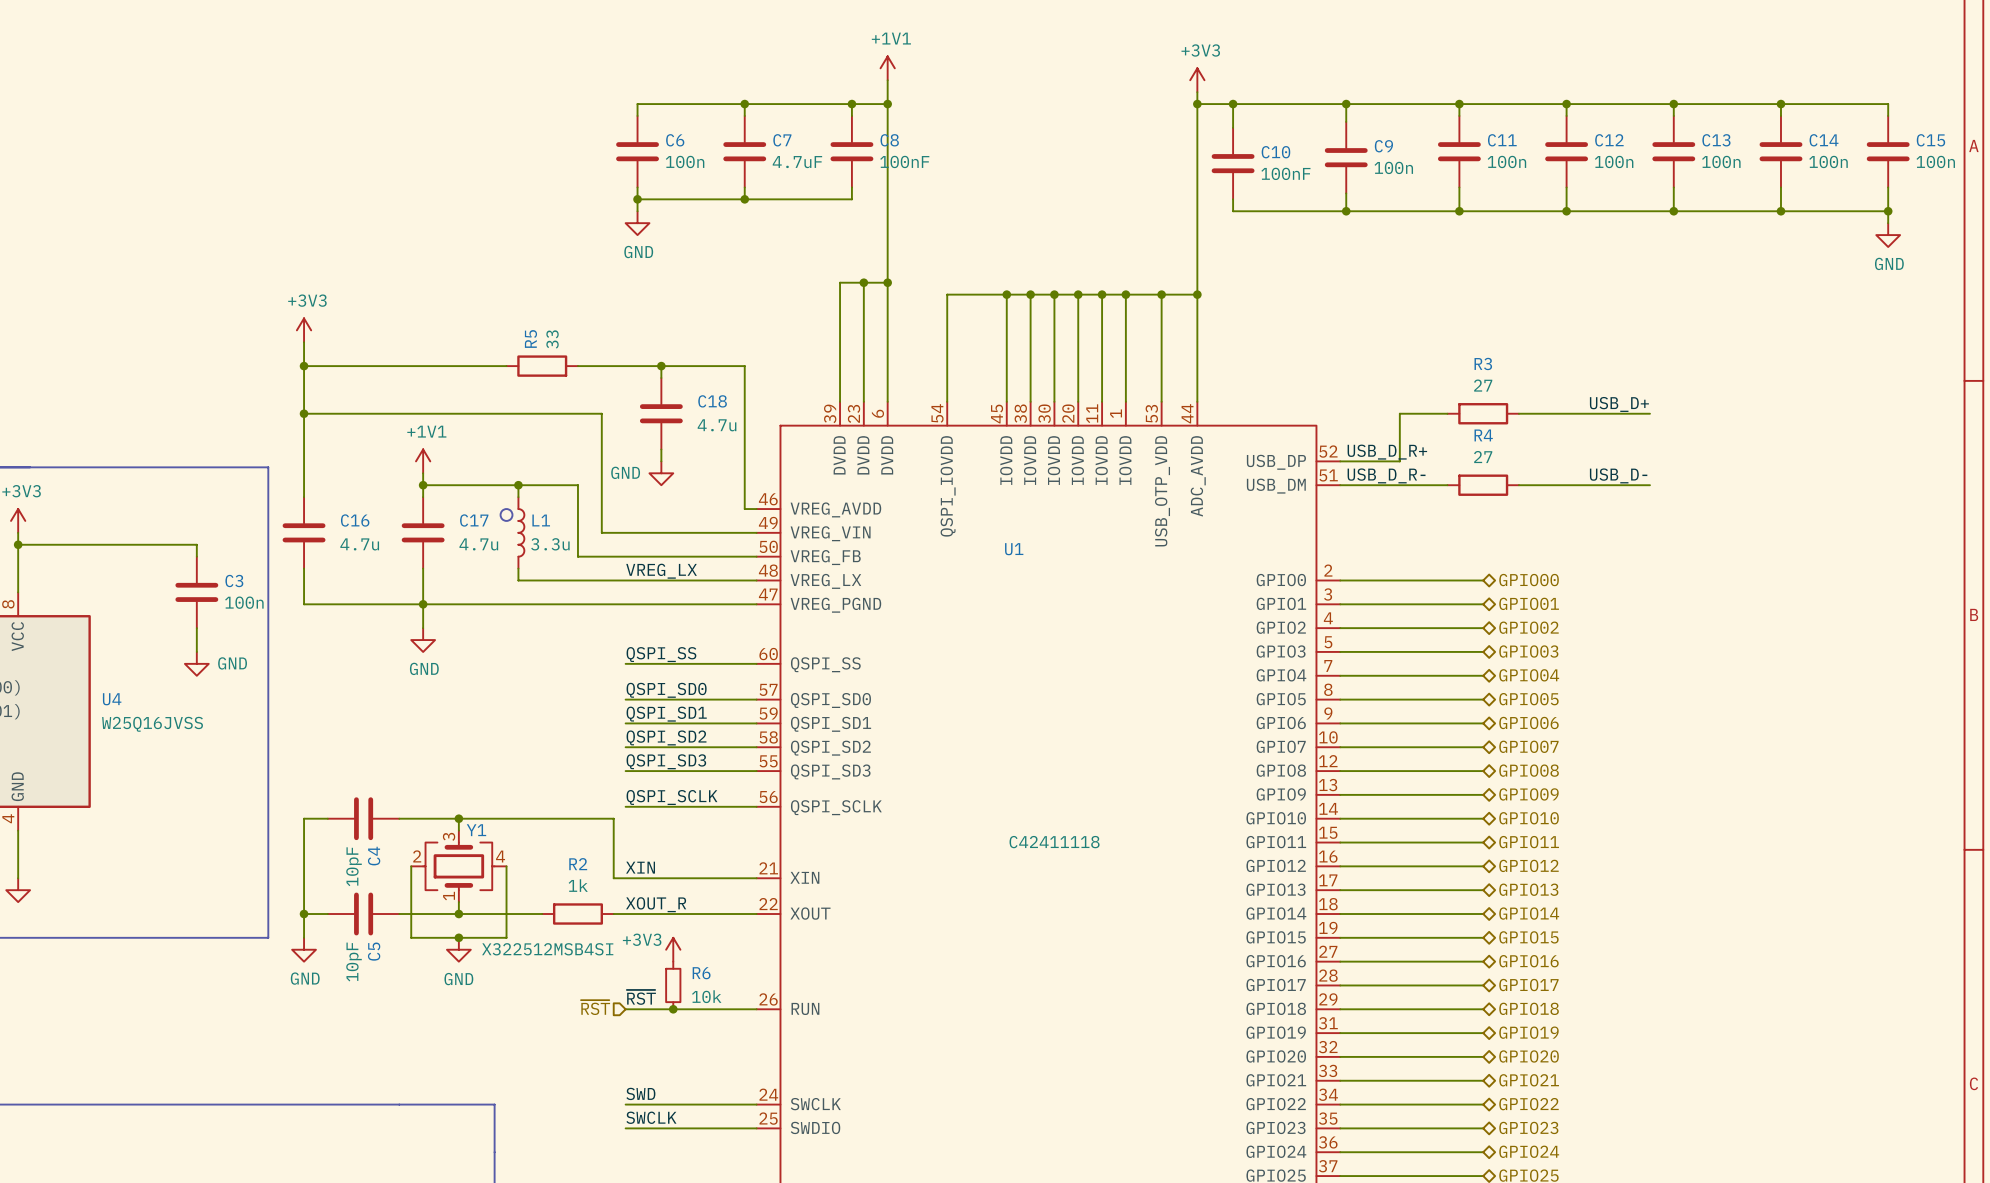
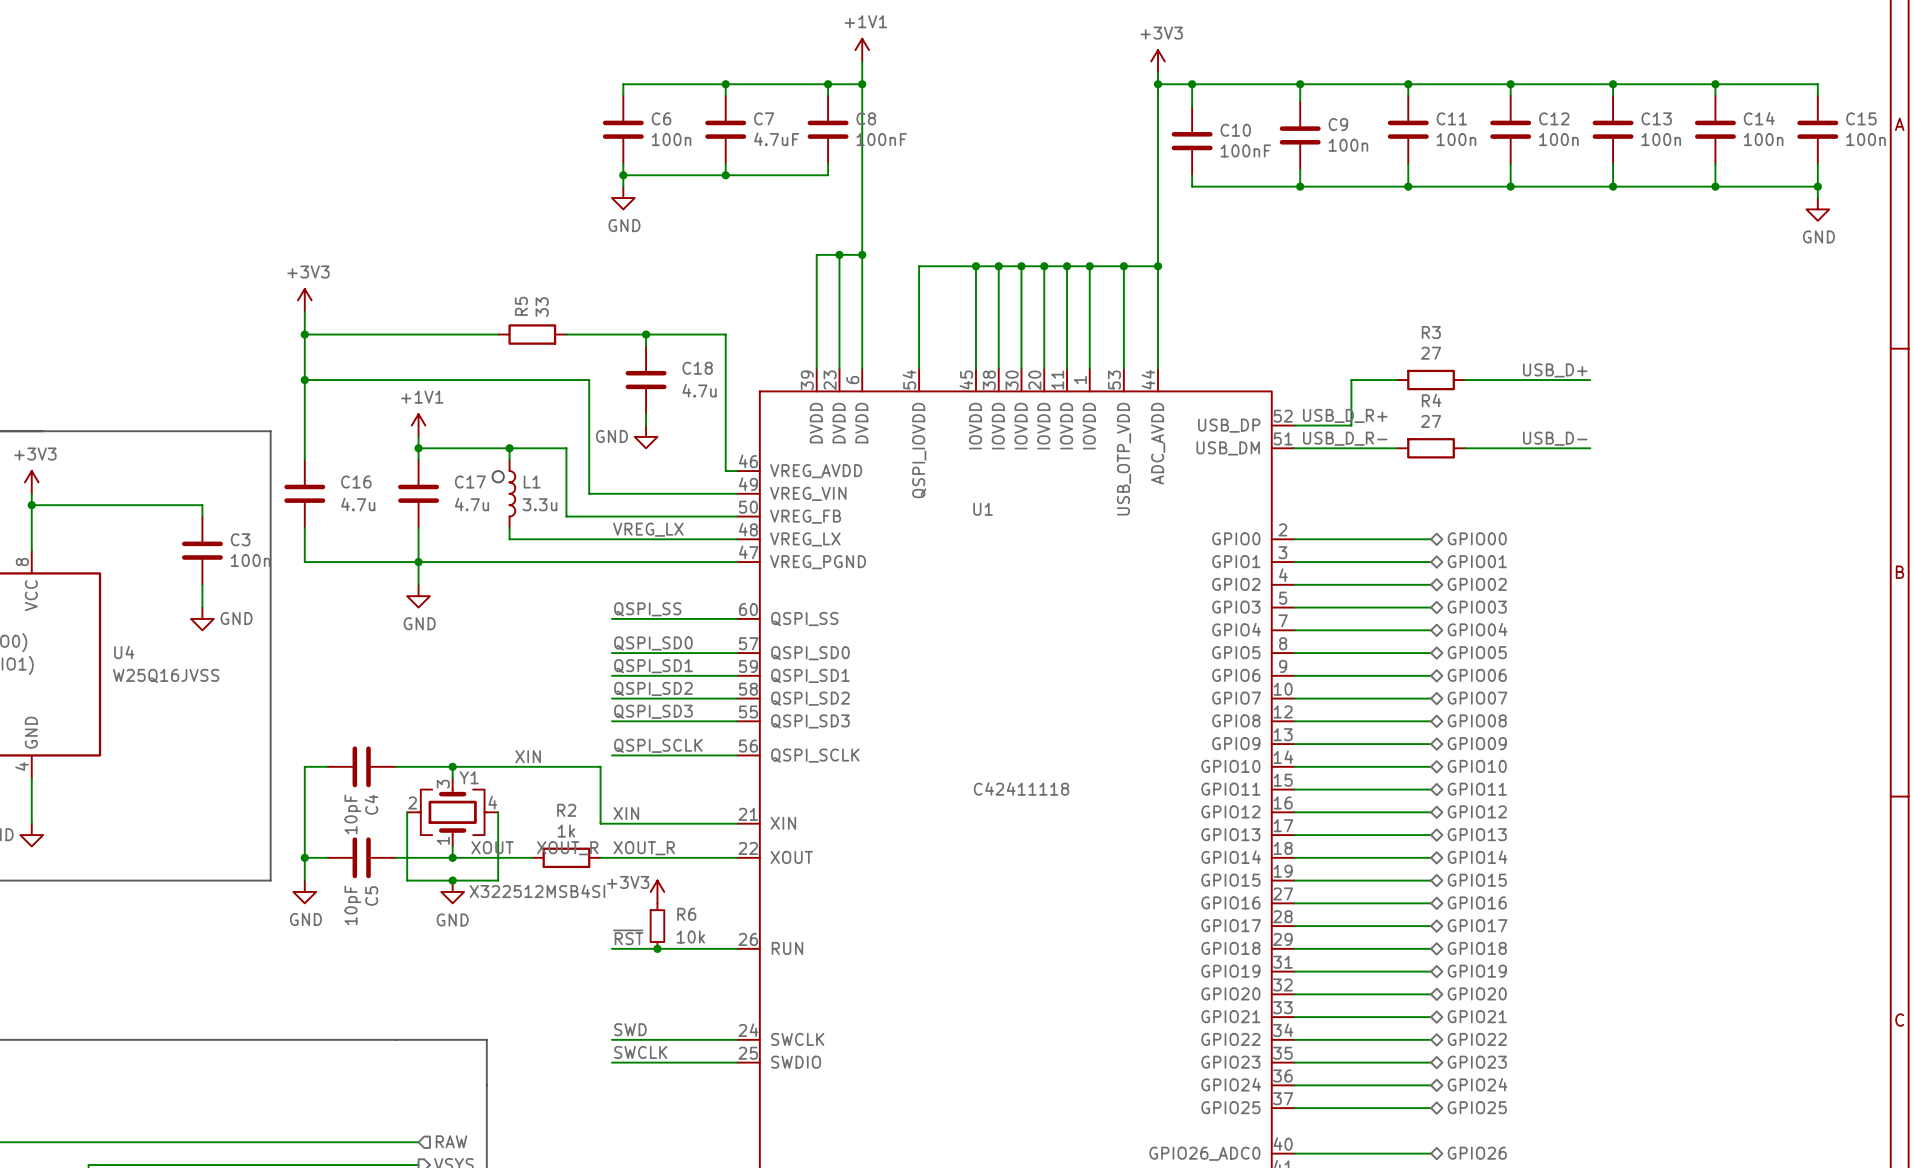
label: none -> XIN (528, 756)
label: none -> XOUT (492, 847)
label: none -> XOUT_R (567, 848)
hierarchical label: ~{RST} (595, 1007) -> none

